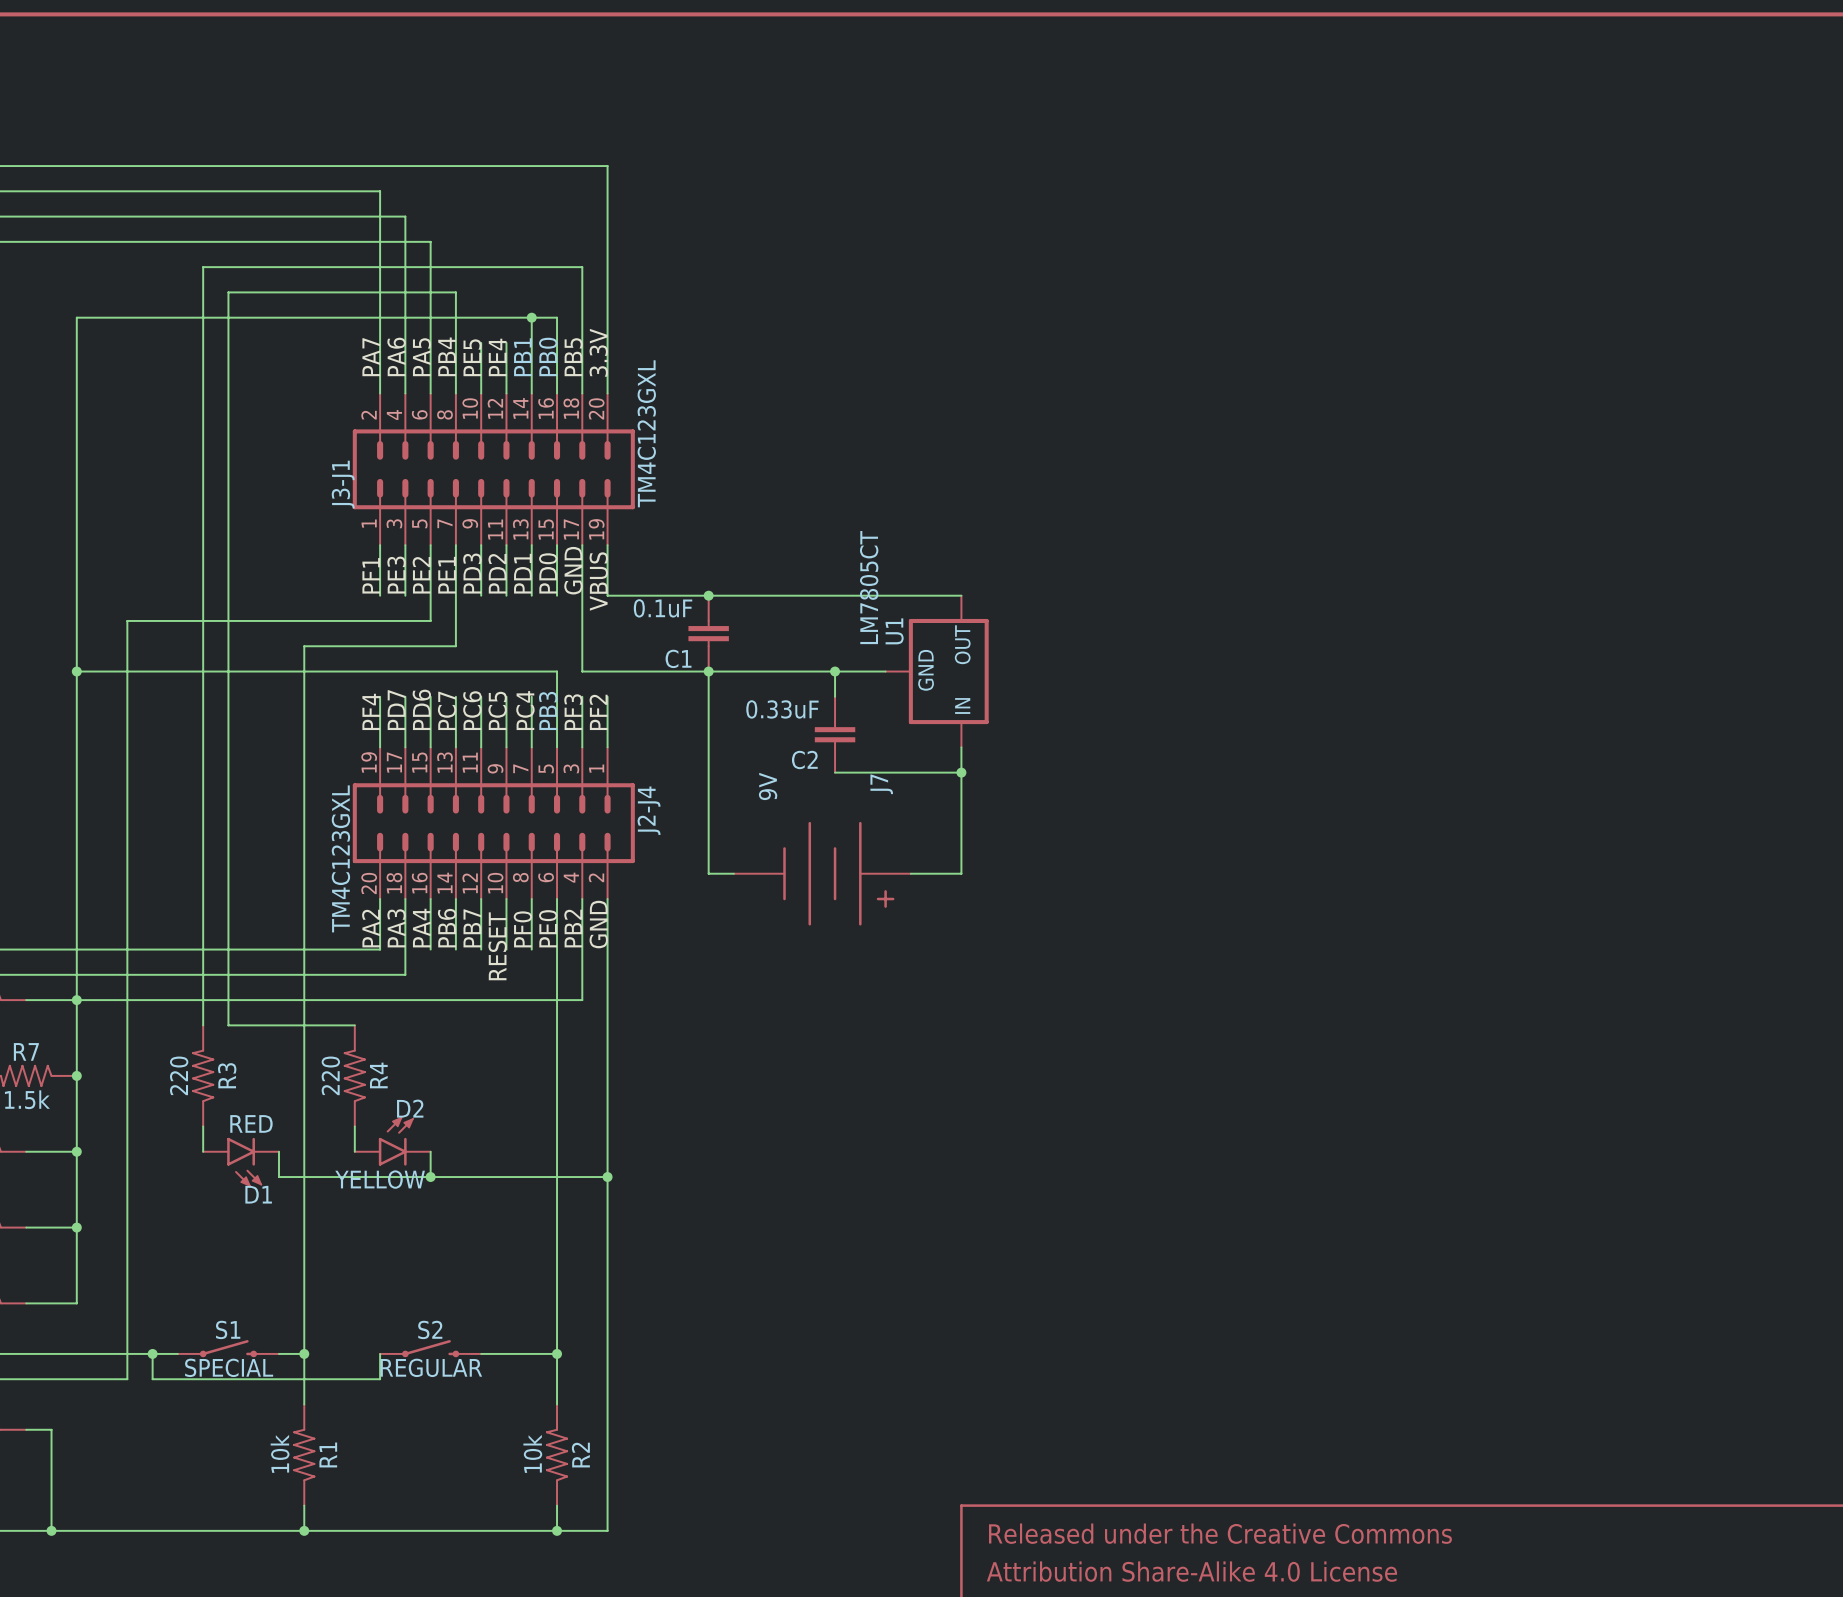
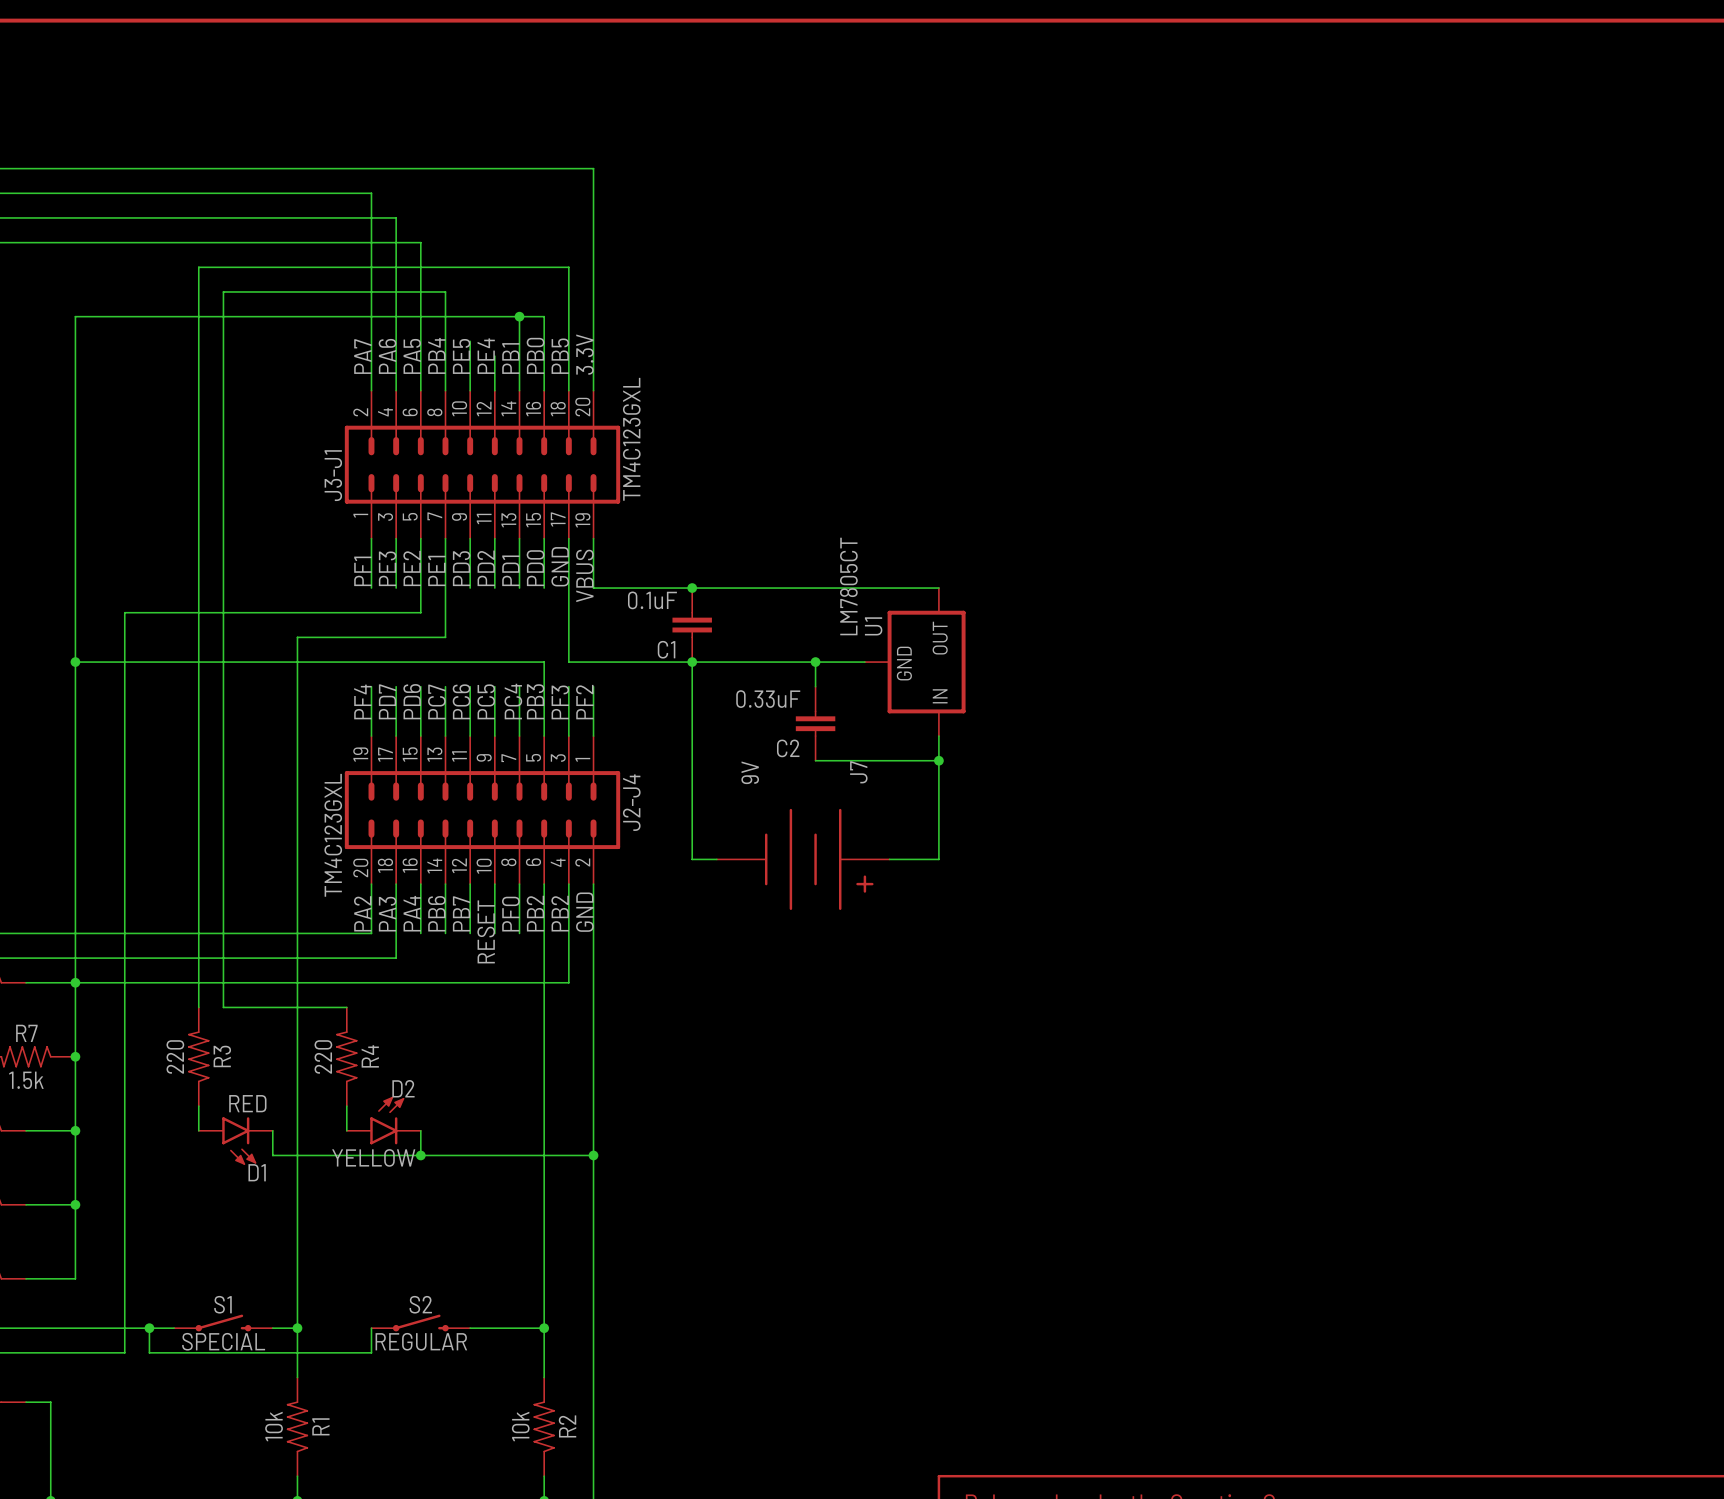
wire: (506, 342) (506, 358) -> none
label: PE0 (548, 928) -> PB2 (535, 913)

